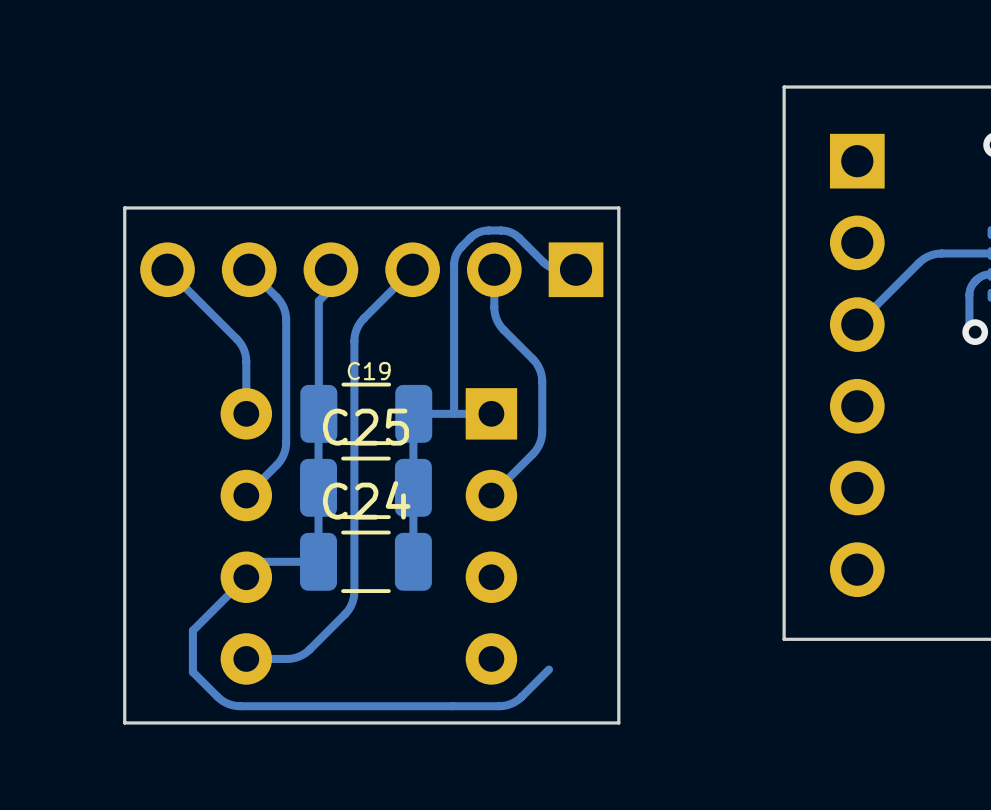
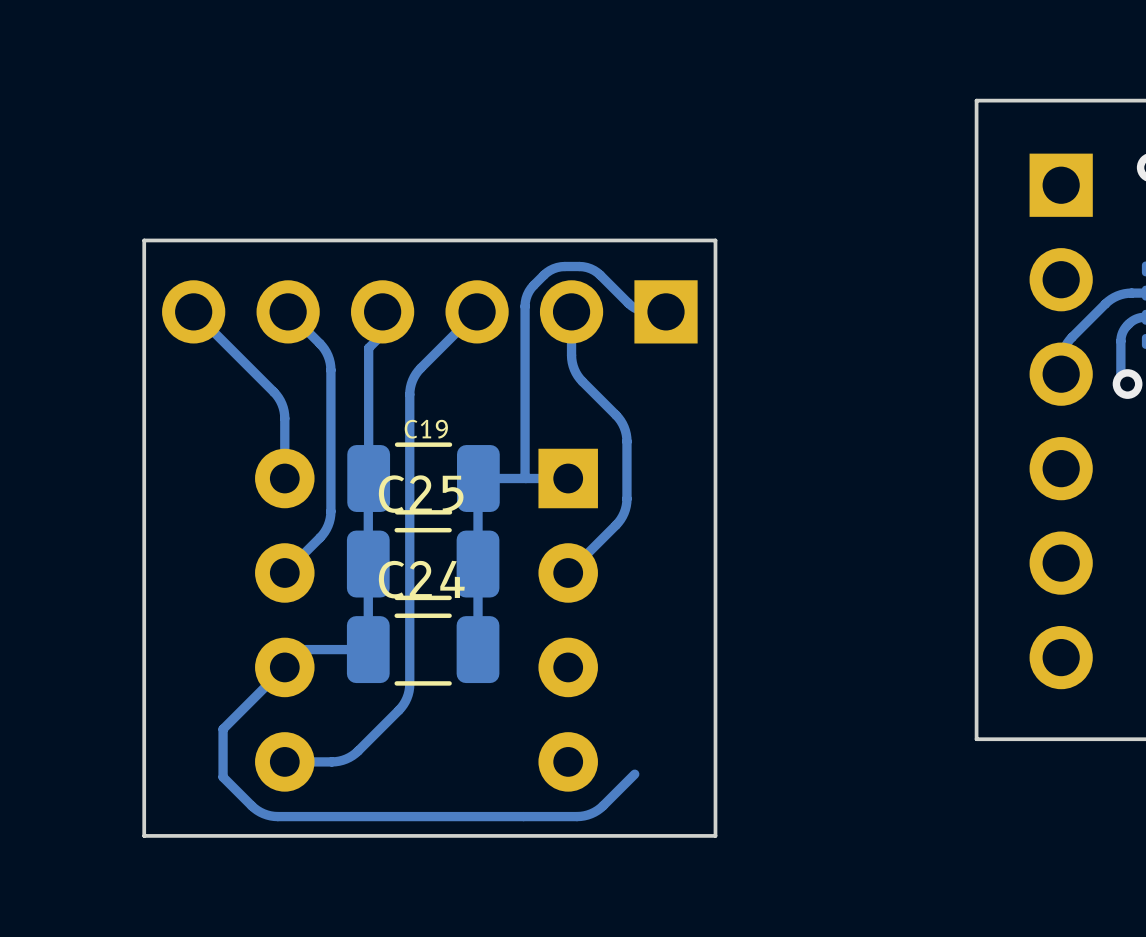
board edge: (844, 87) (784, 87) (784, 639) (844, 639) -> (976, 100) (976, 739)
track: (978, 253) (938, 253) (926, 257) (857, 324) -> (1131, 293) (1120, 294) (1108, 301) (1069, 339) (1061, 356) (1061, 374)
part position: (857, 365) -> (1061, 421)

